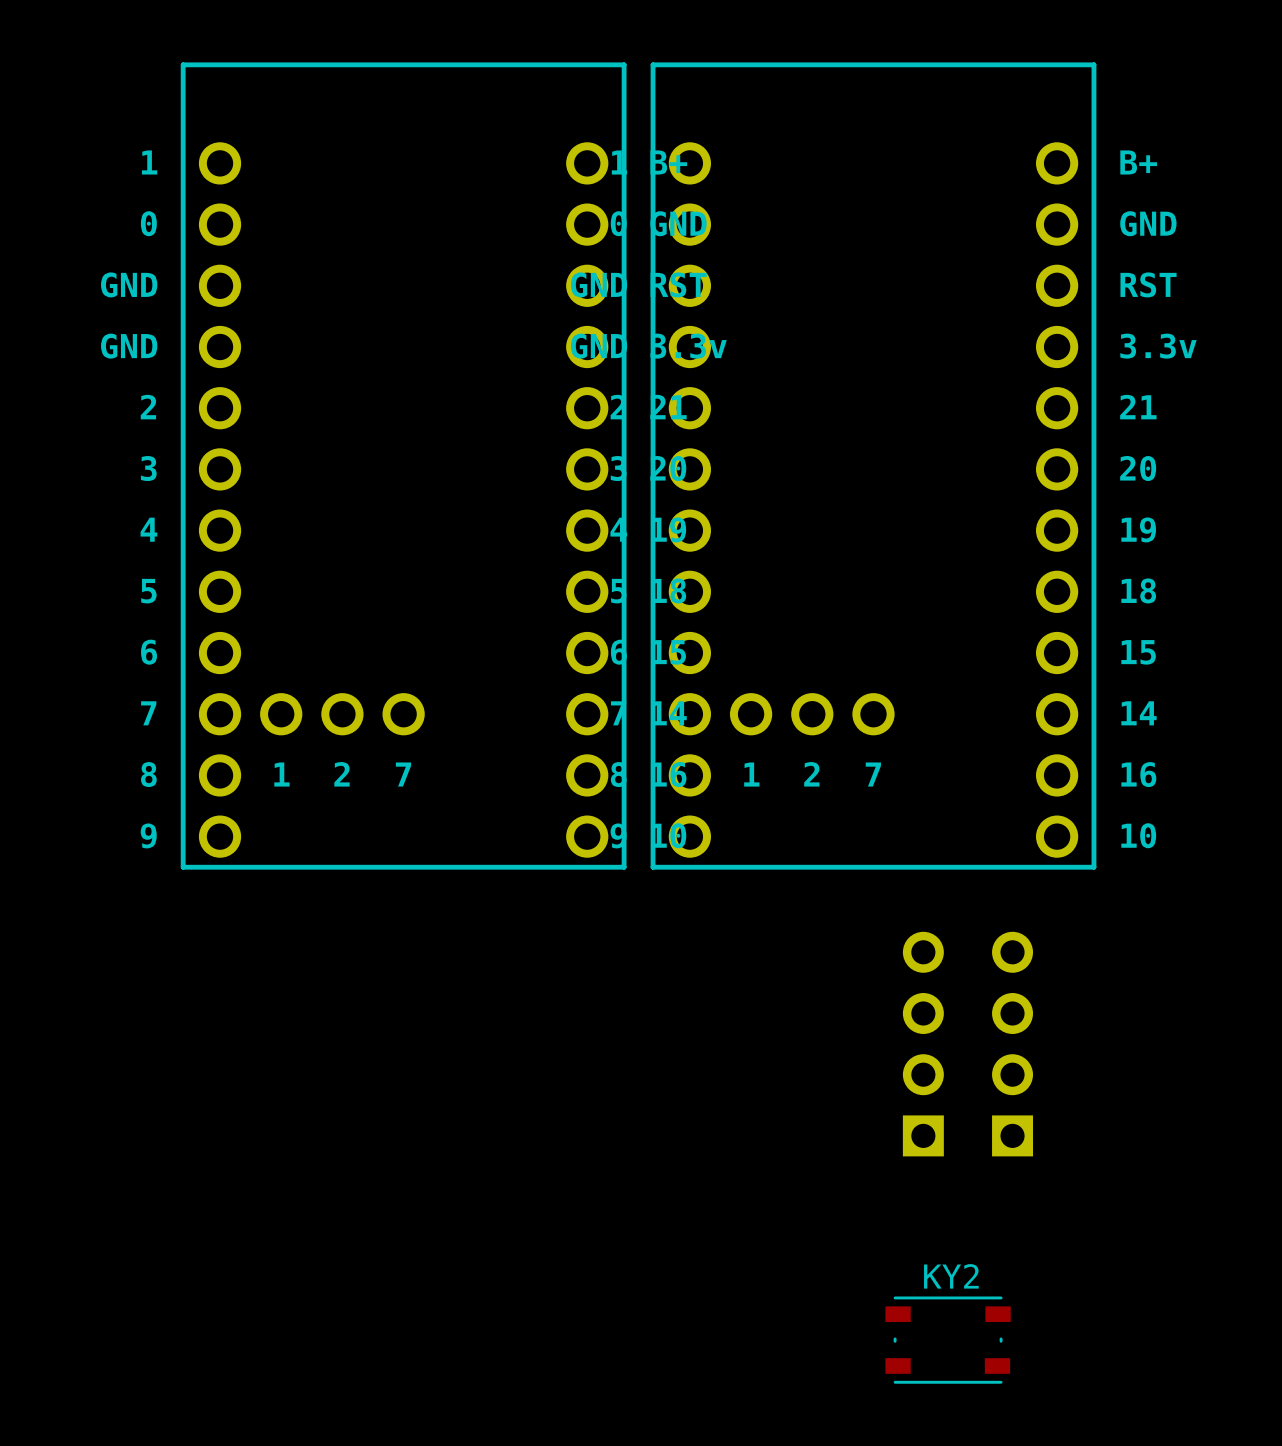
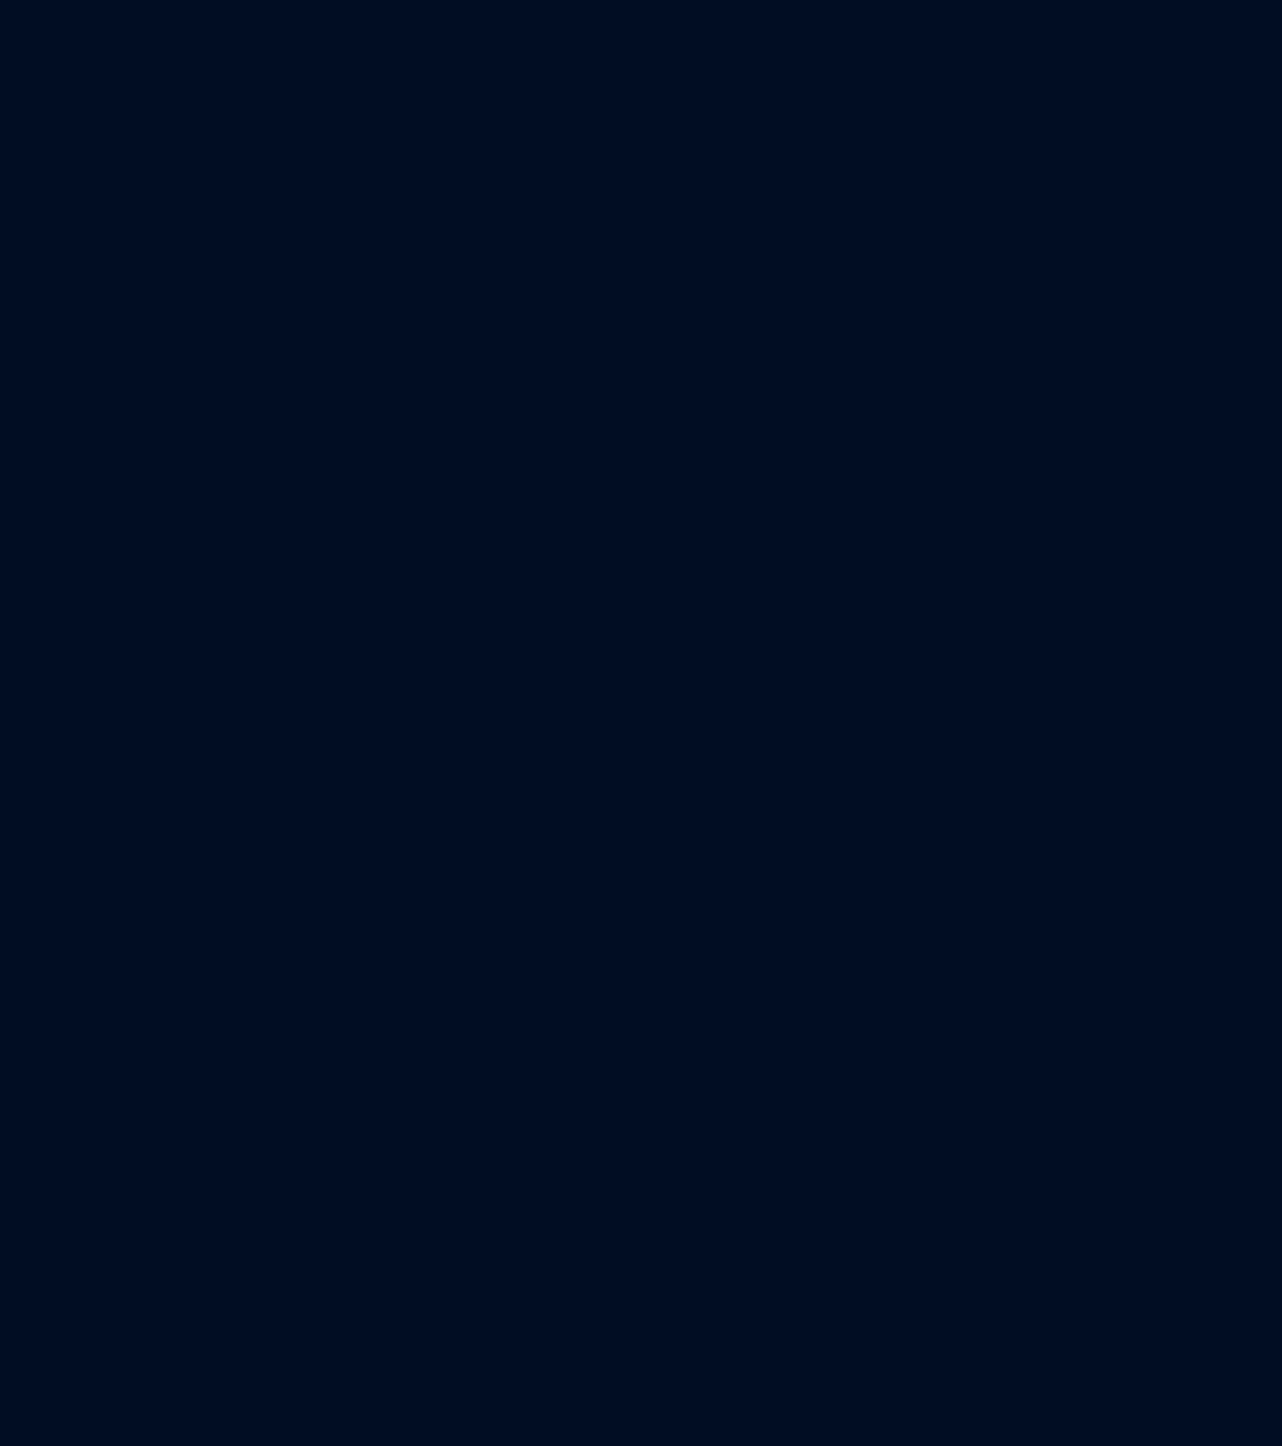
part: (403, 466) -> none
part: (873, 466) -> none
part: (923, 1044) -> none
part: (1012, 1044) -> none
KY2: (948, 1340) -> none

